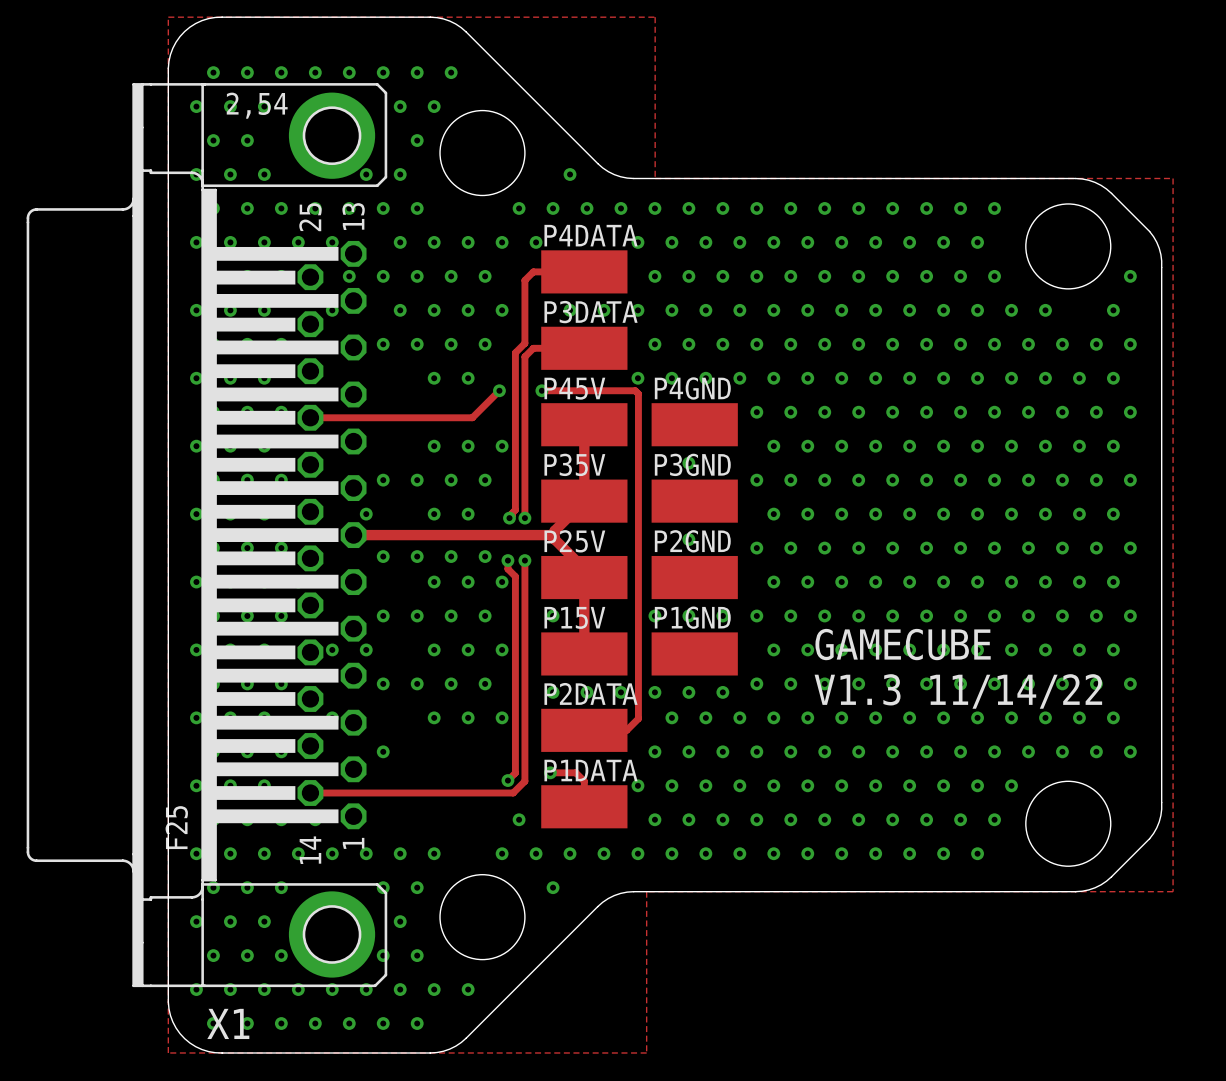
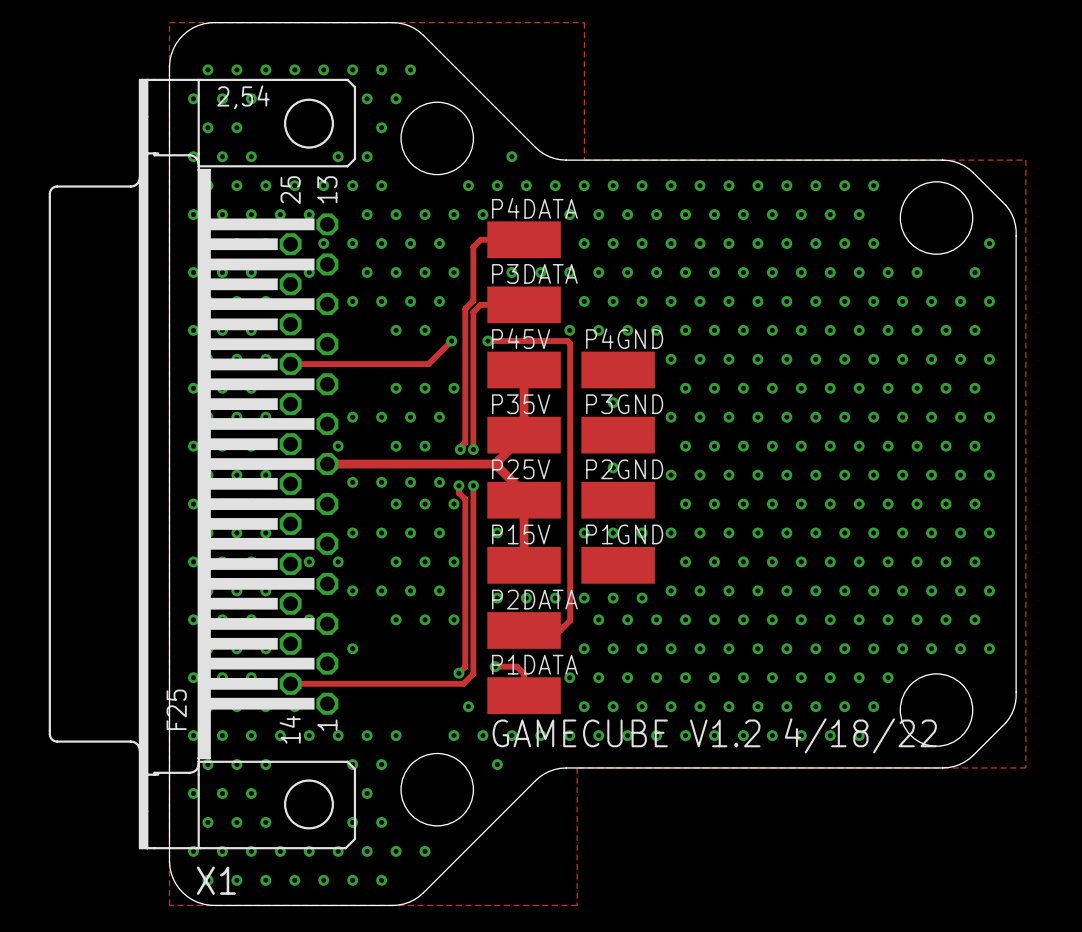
X1 footprint: [26, 83, 388, 988] -> [48, 78, 357, 850]
text: GAMECUBE (903, 644) -> none
text: V1.3 11/14/22 (958, 691) -> none
text: none -> GAMECUBE V1.2 4/18/22 (714, 735)

